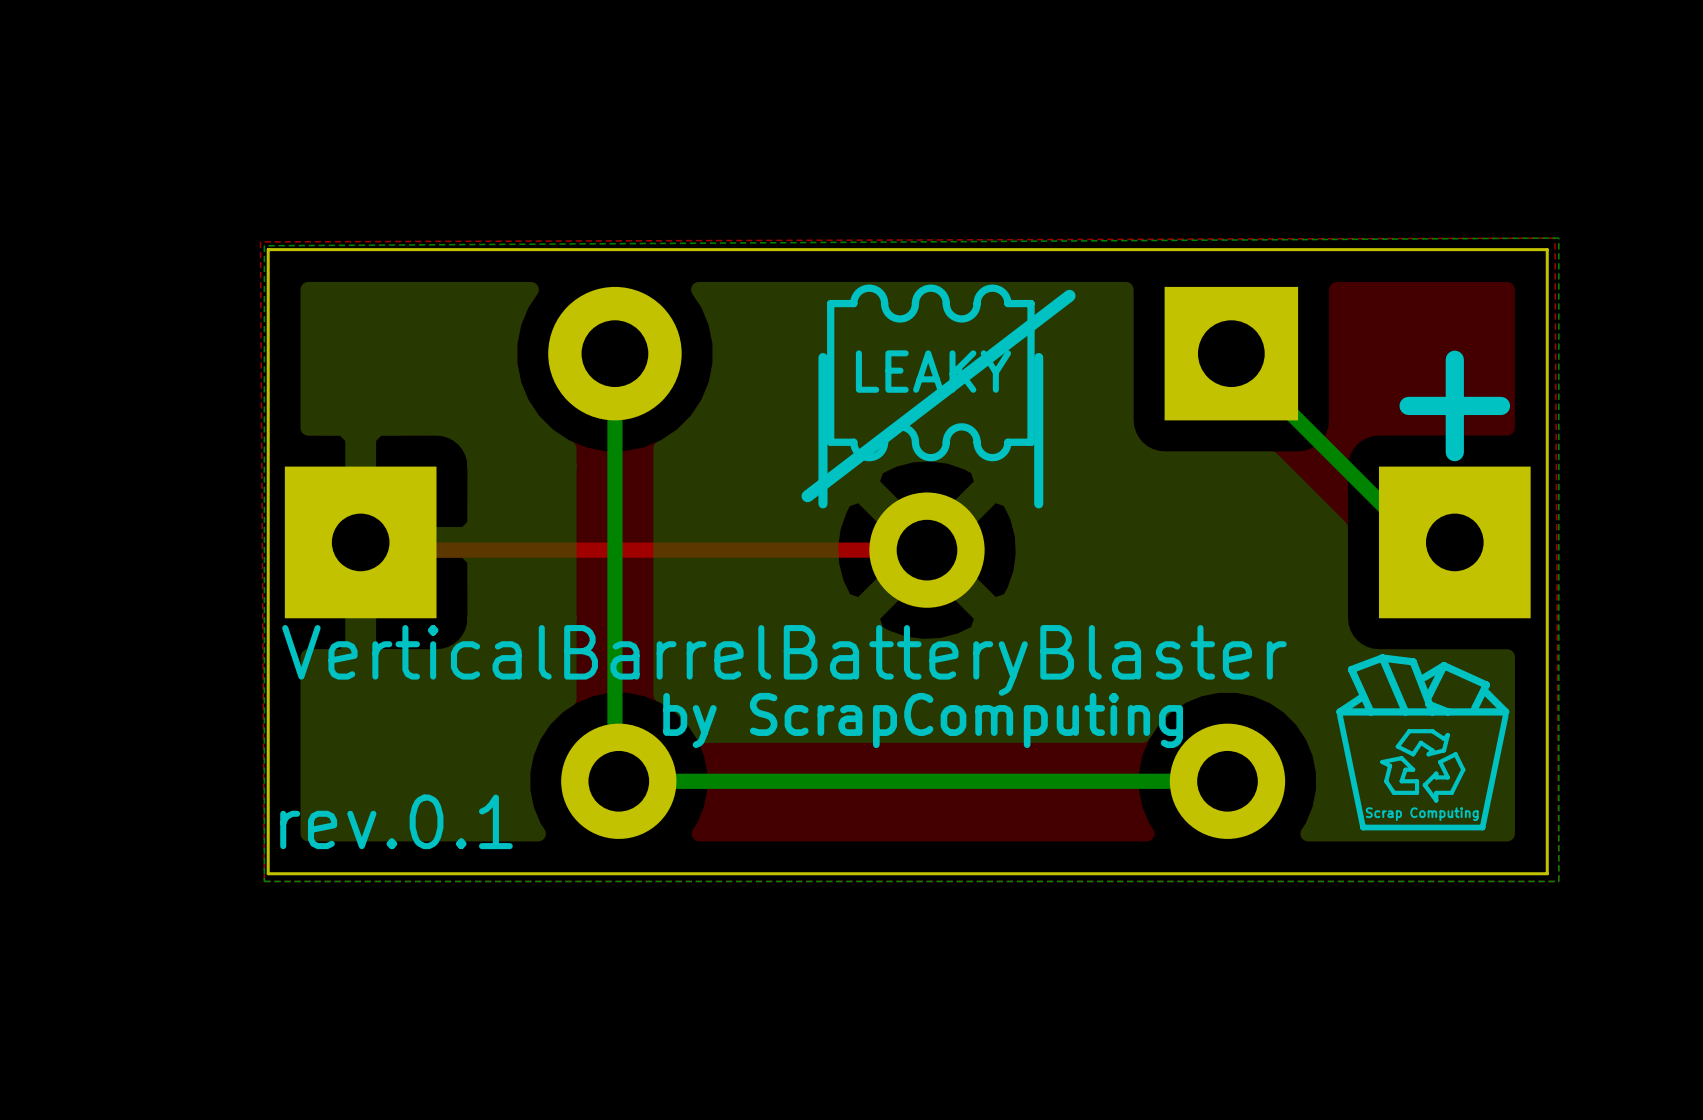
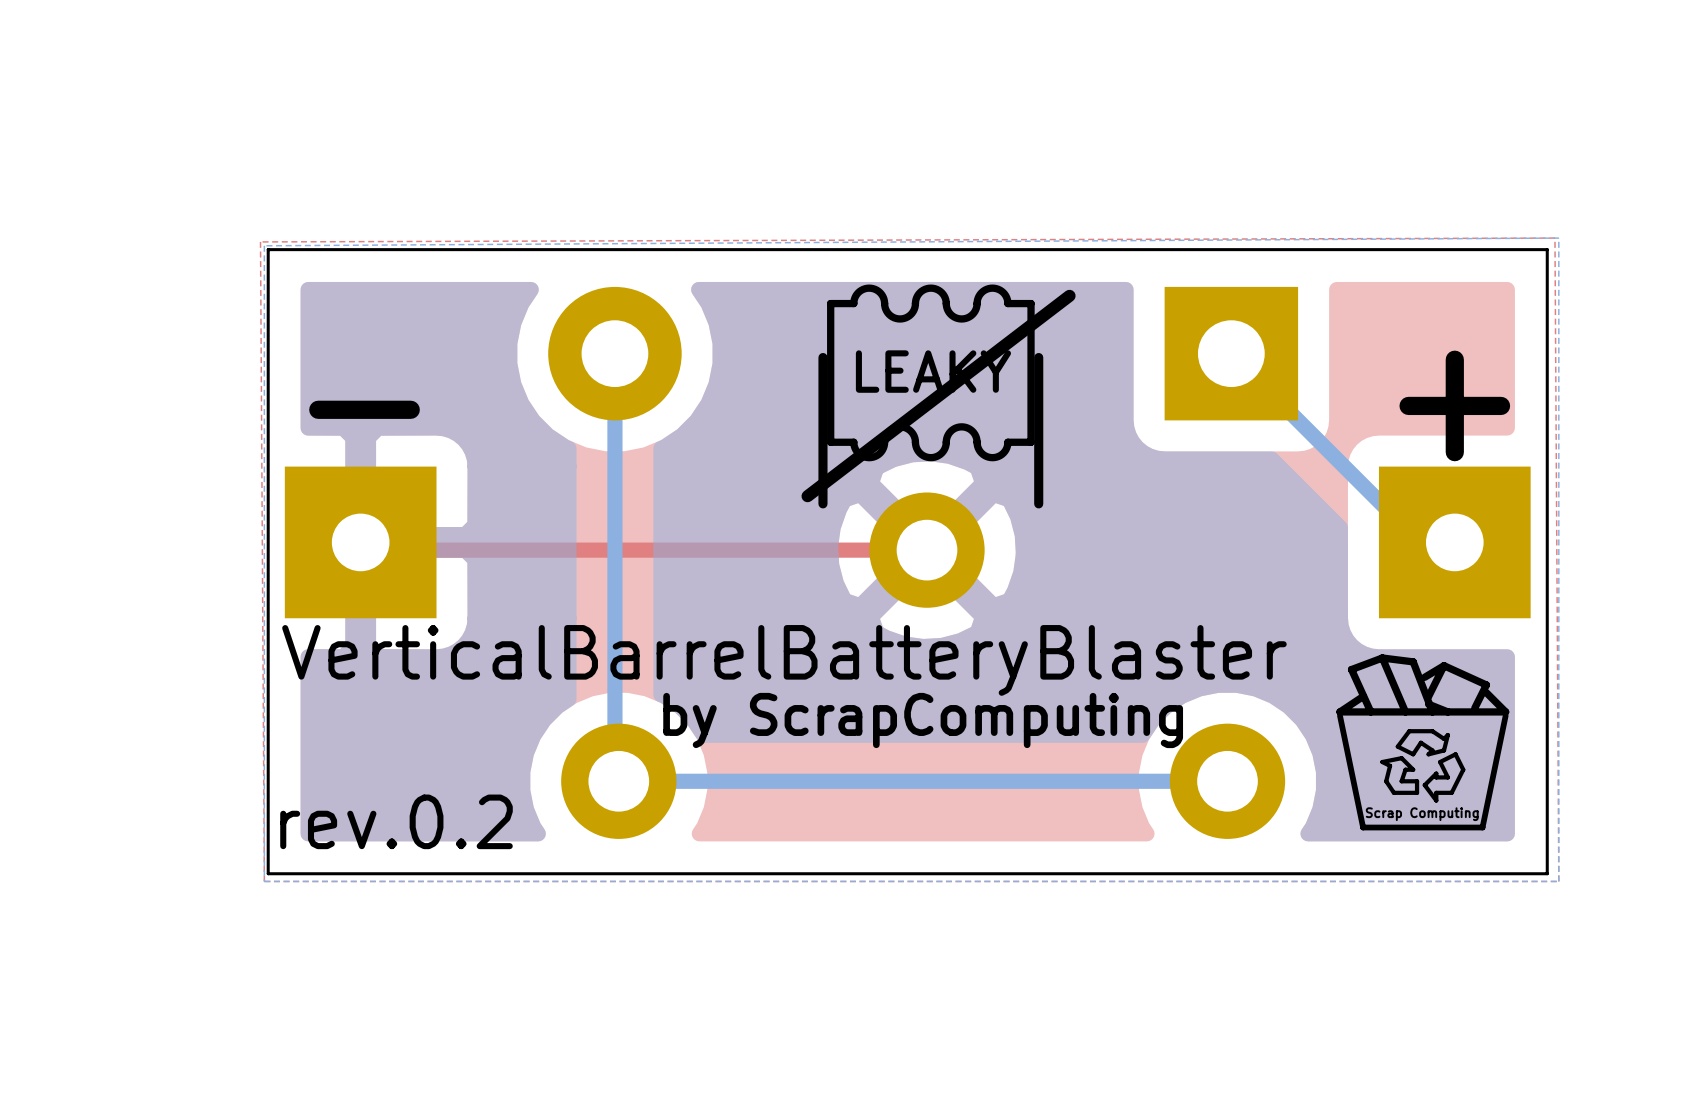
text: none -> - (364, 409)
text: rev.0.1 (396, 821) -> rev.0.2 (396, 821)

